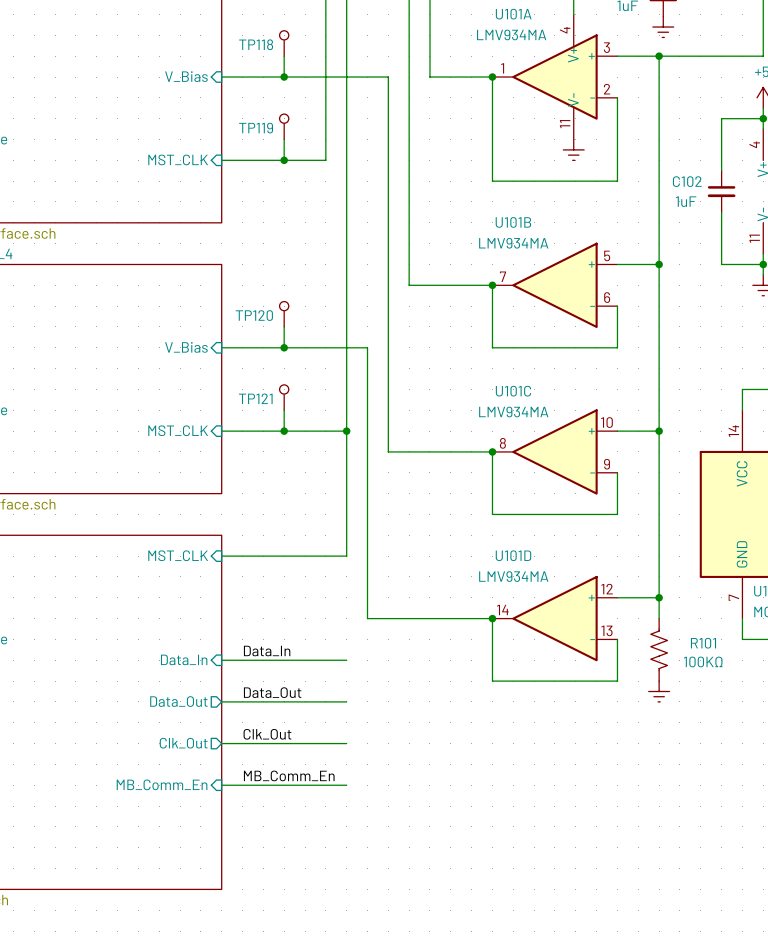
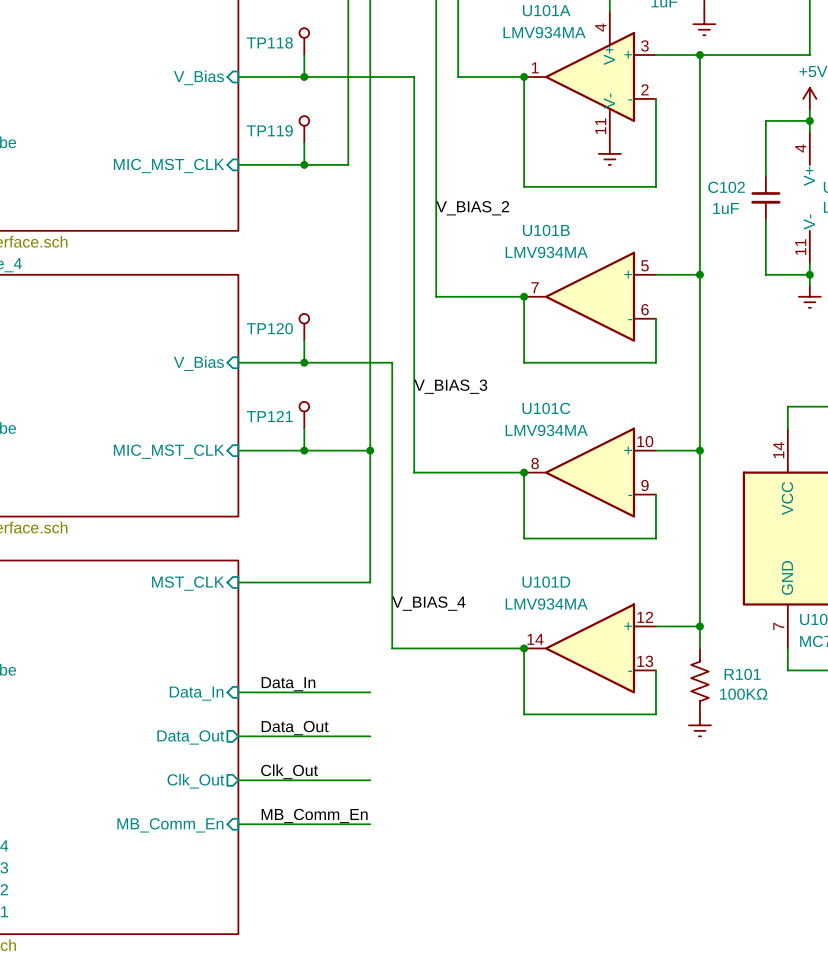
sheet pin: MST_CLK (178, 159) -> MIC_MST_CLK (169, 166)
label: none -> V_BIAS_2 (472, 208)
label: none -> V_BIAS_3 (450, 386)
sheet pin: MST_CLK (178, 430) -> MIC_MST_CLK (169, 451)
label: none -> V_BIAS_4 (428, 603)

